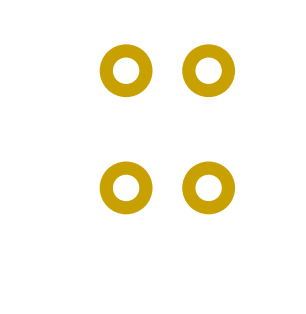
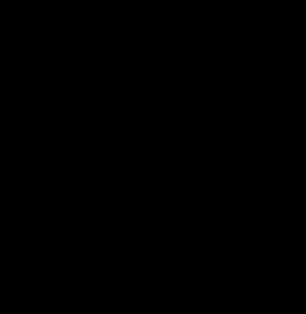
part: (167, 70) -> none
part: (167, 187) -> none

